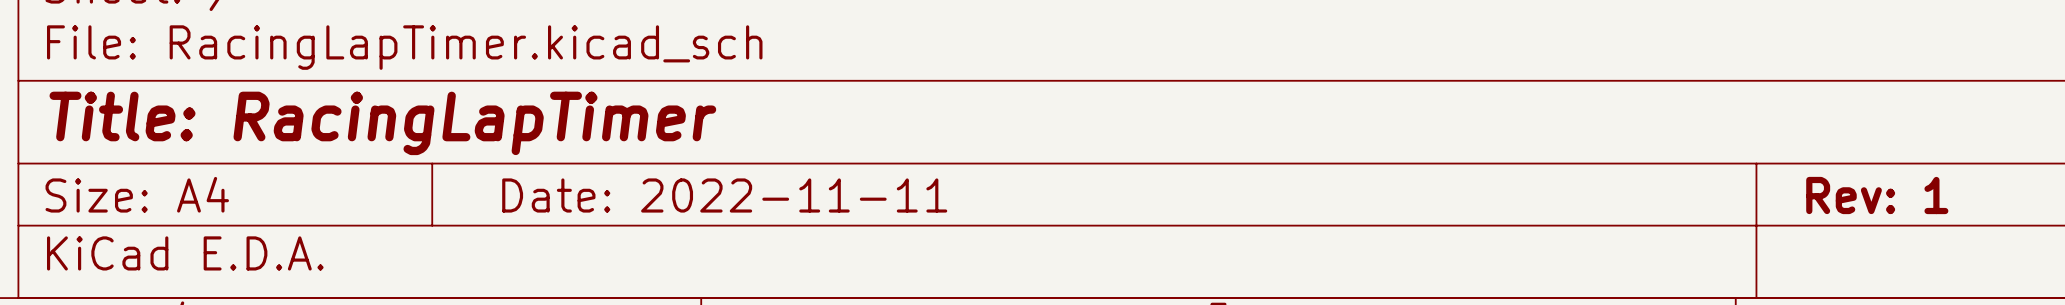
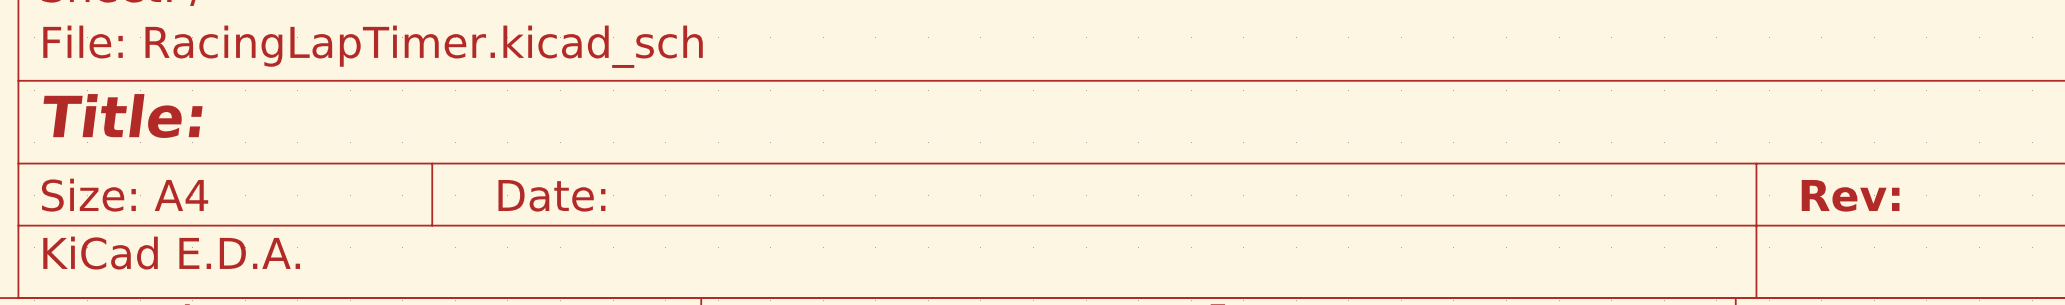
title block: Title: RacingLapTimer (382, 123) -> Title: (123, 116)
title block: Date: 2022-11-11 (724, 195) -> Date: (551, 195)
title block: Rev: 1 (1877, 195) -> Rev: (1850, 195)

